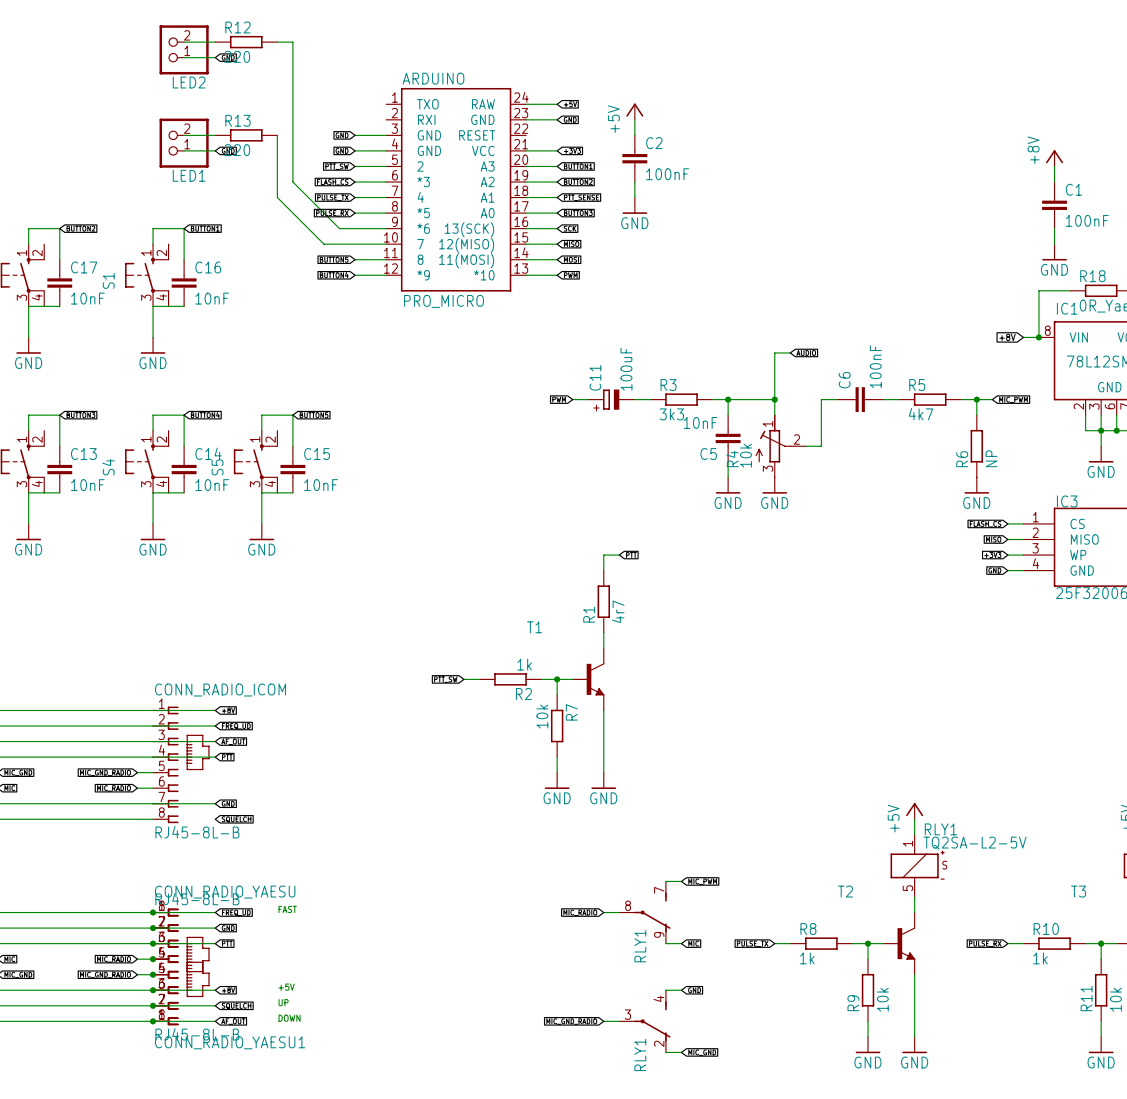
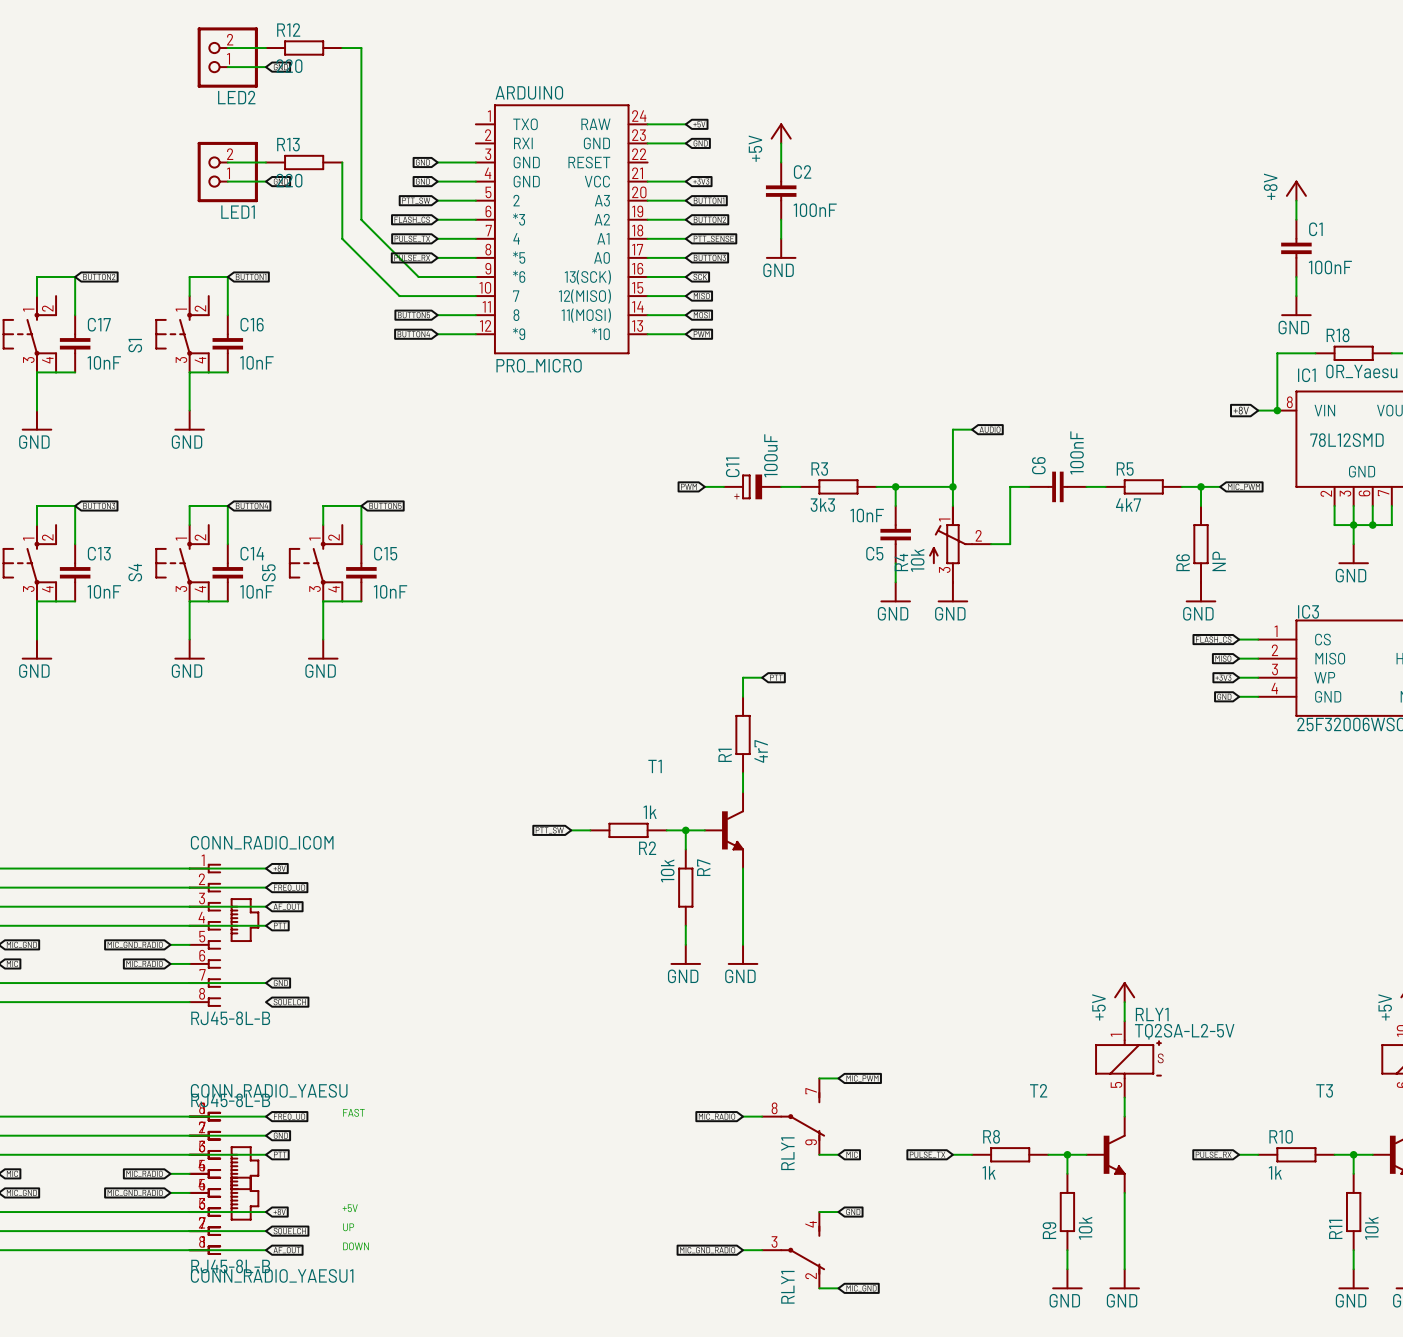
junction: (153, 912) -> none
junction: (153, 928) -> none
junction: (153, 943) -> none
junction: (153, 959) -> none
junction: (153, 974) -> none
junction: (153, 990) -> none
junction: (153, 1005) -> none
junction: (153, 1021) -> none

